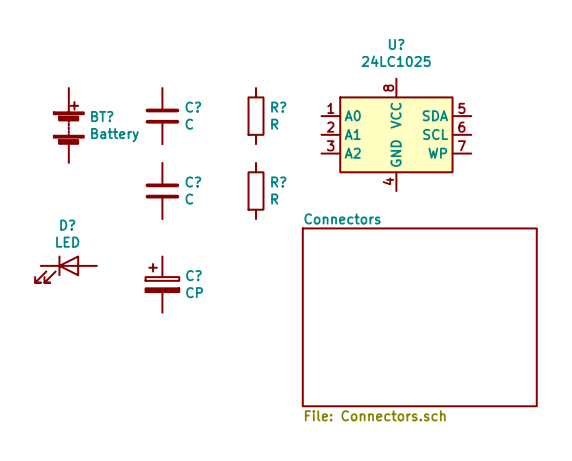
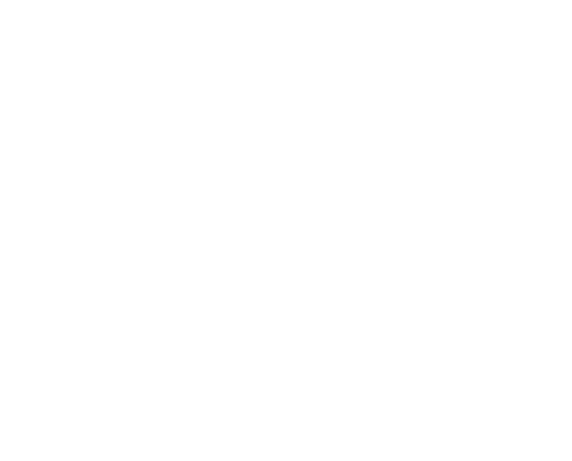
C?: C (162, 116) -> none
R?: R (256, 116) -> none
BT?: Battery (68, 125) -> none
U?: 24LC1025 (396, 134) -> none
C?: C (162, 191) -> none
R?: R (256, 191) -> none
D?: LED (66, 269) -> none
C?: CP (162, 284) -> none
sheet Connectors: File: Connectors.sch (419, 317) -> none

